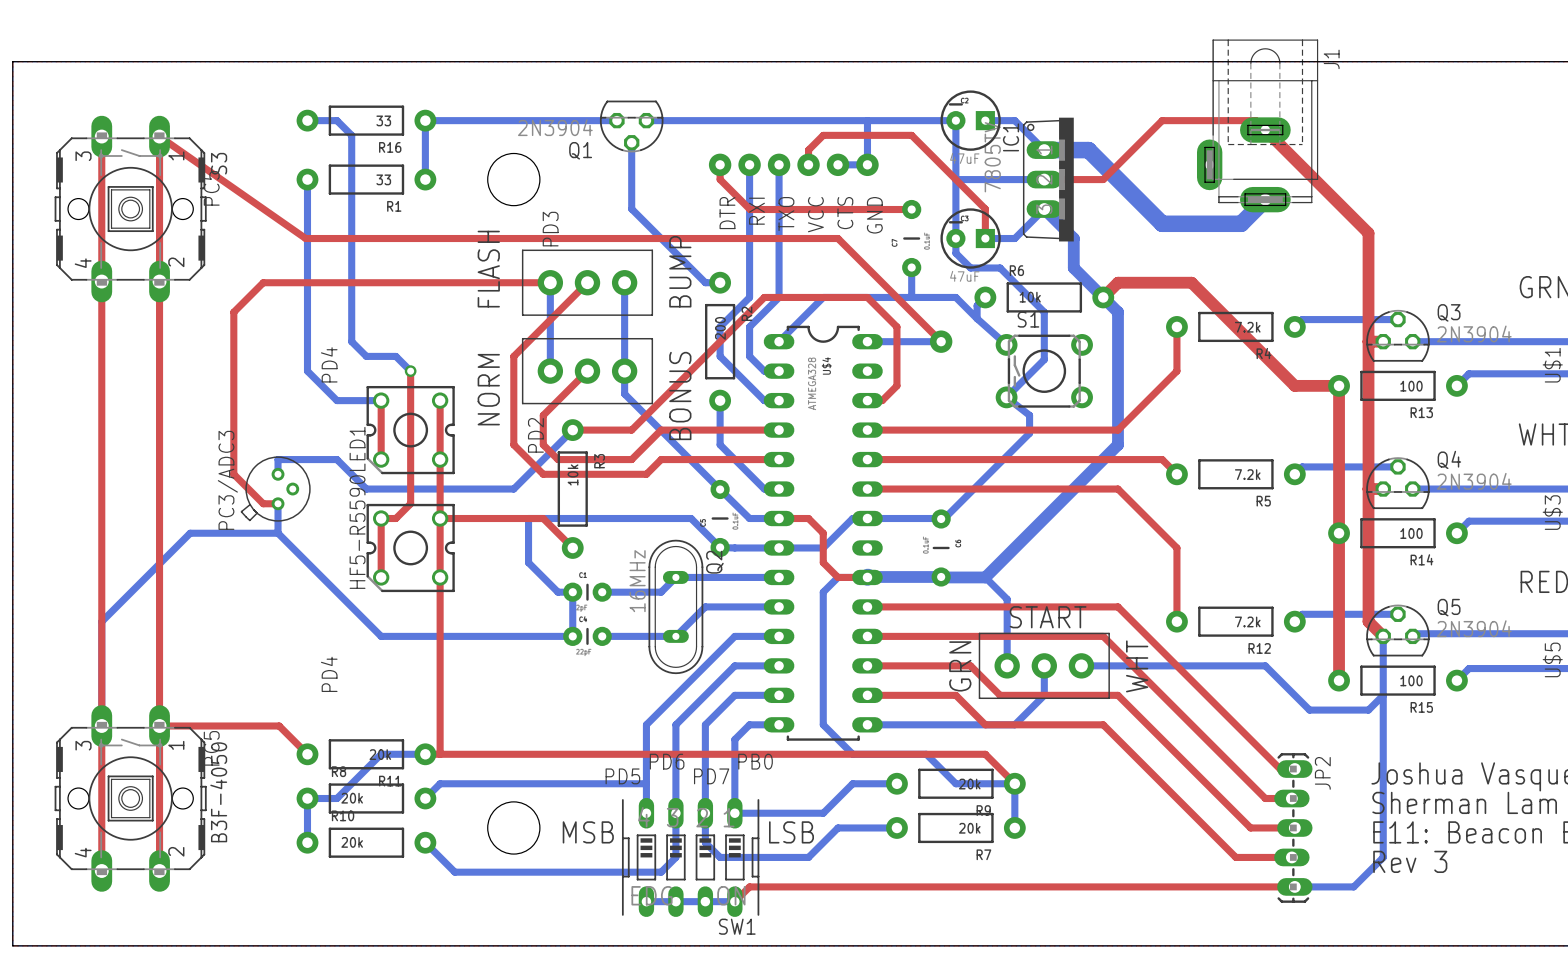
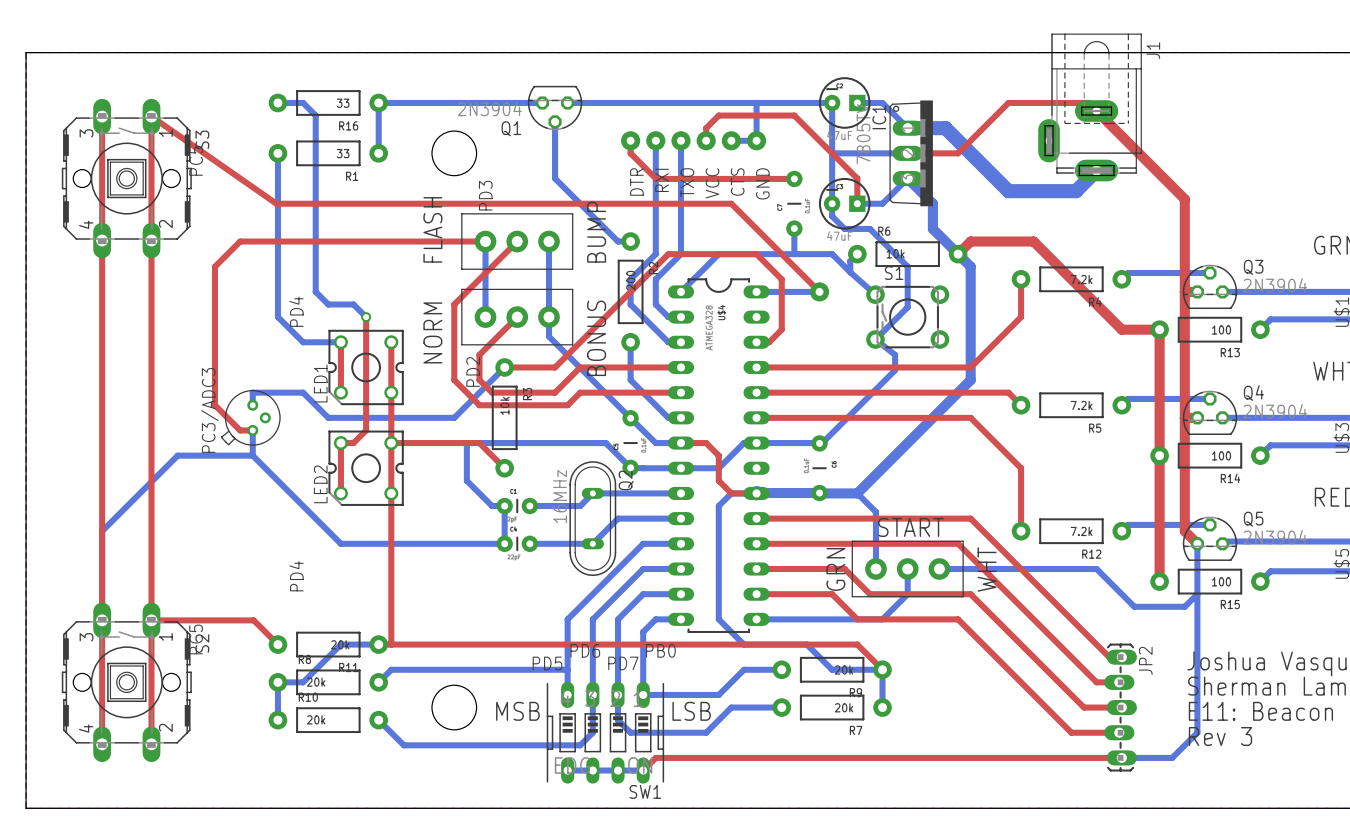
HF5-R5590 name: HF5-R5590 (357, 532) -> LED2 (320, 484)
B3F-4050 name: B3F-4050 (218, 792) -> S2 (202, 643)

